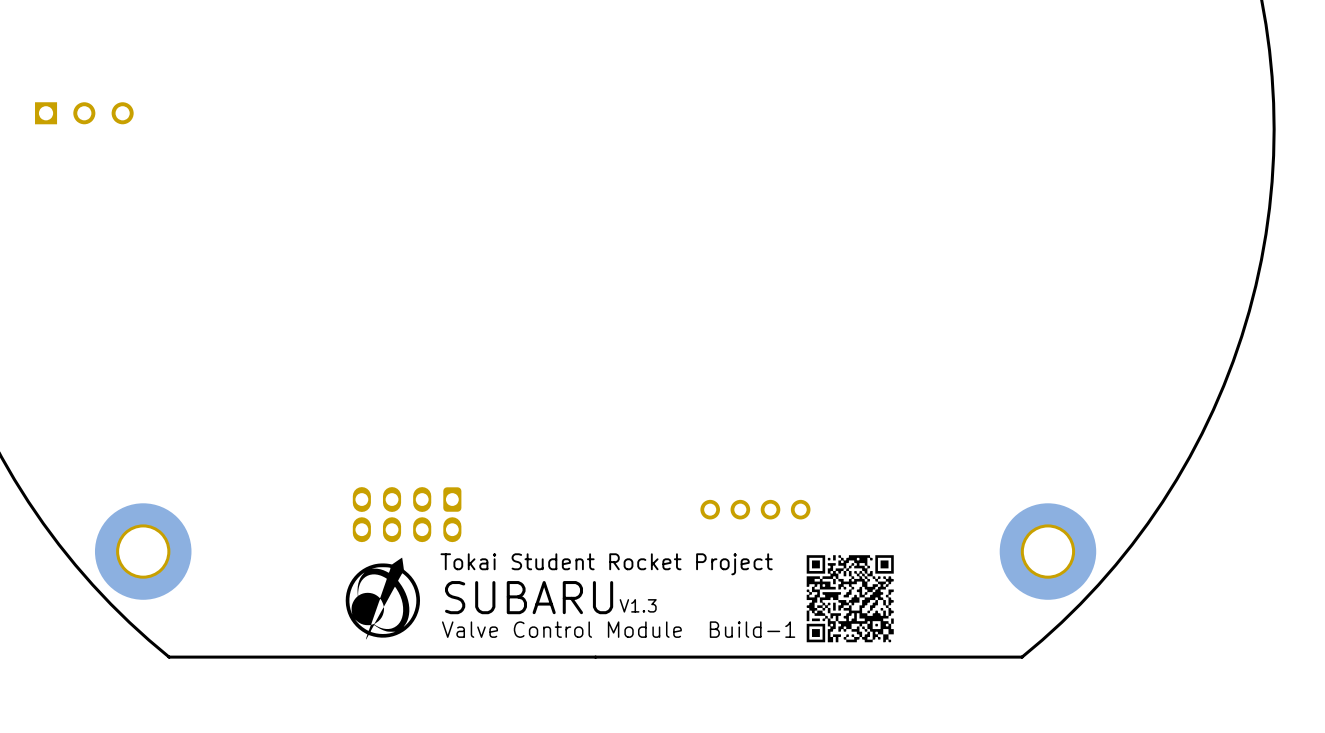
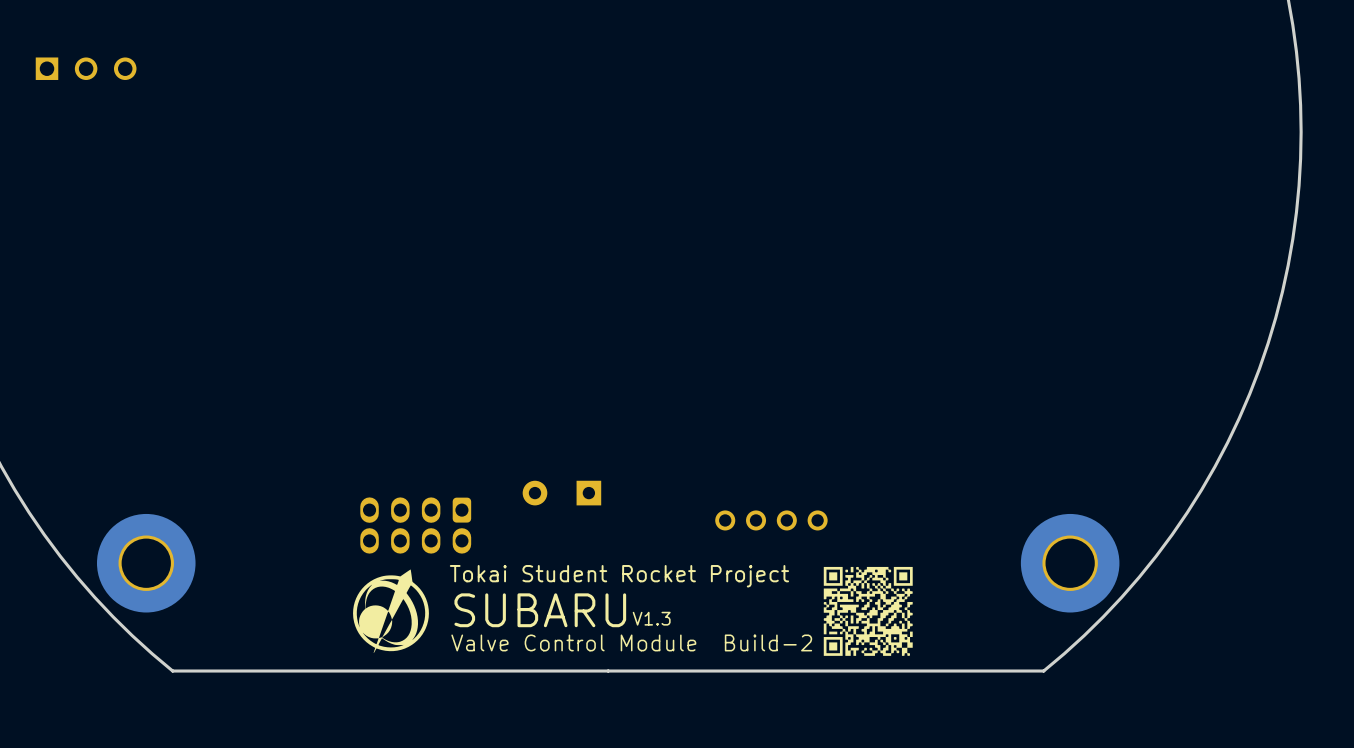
part position: (84, 113) -> (86, 68)
part: none -> (561, 493)
text: Valve Control Module Build-1 (618, 629) -> Valve Control Module Build-2 (631, 642)

